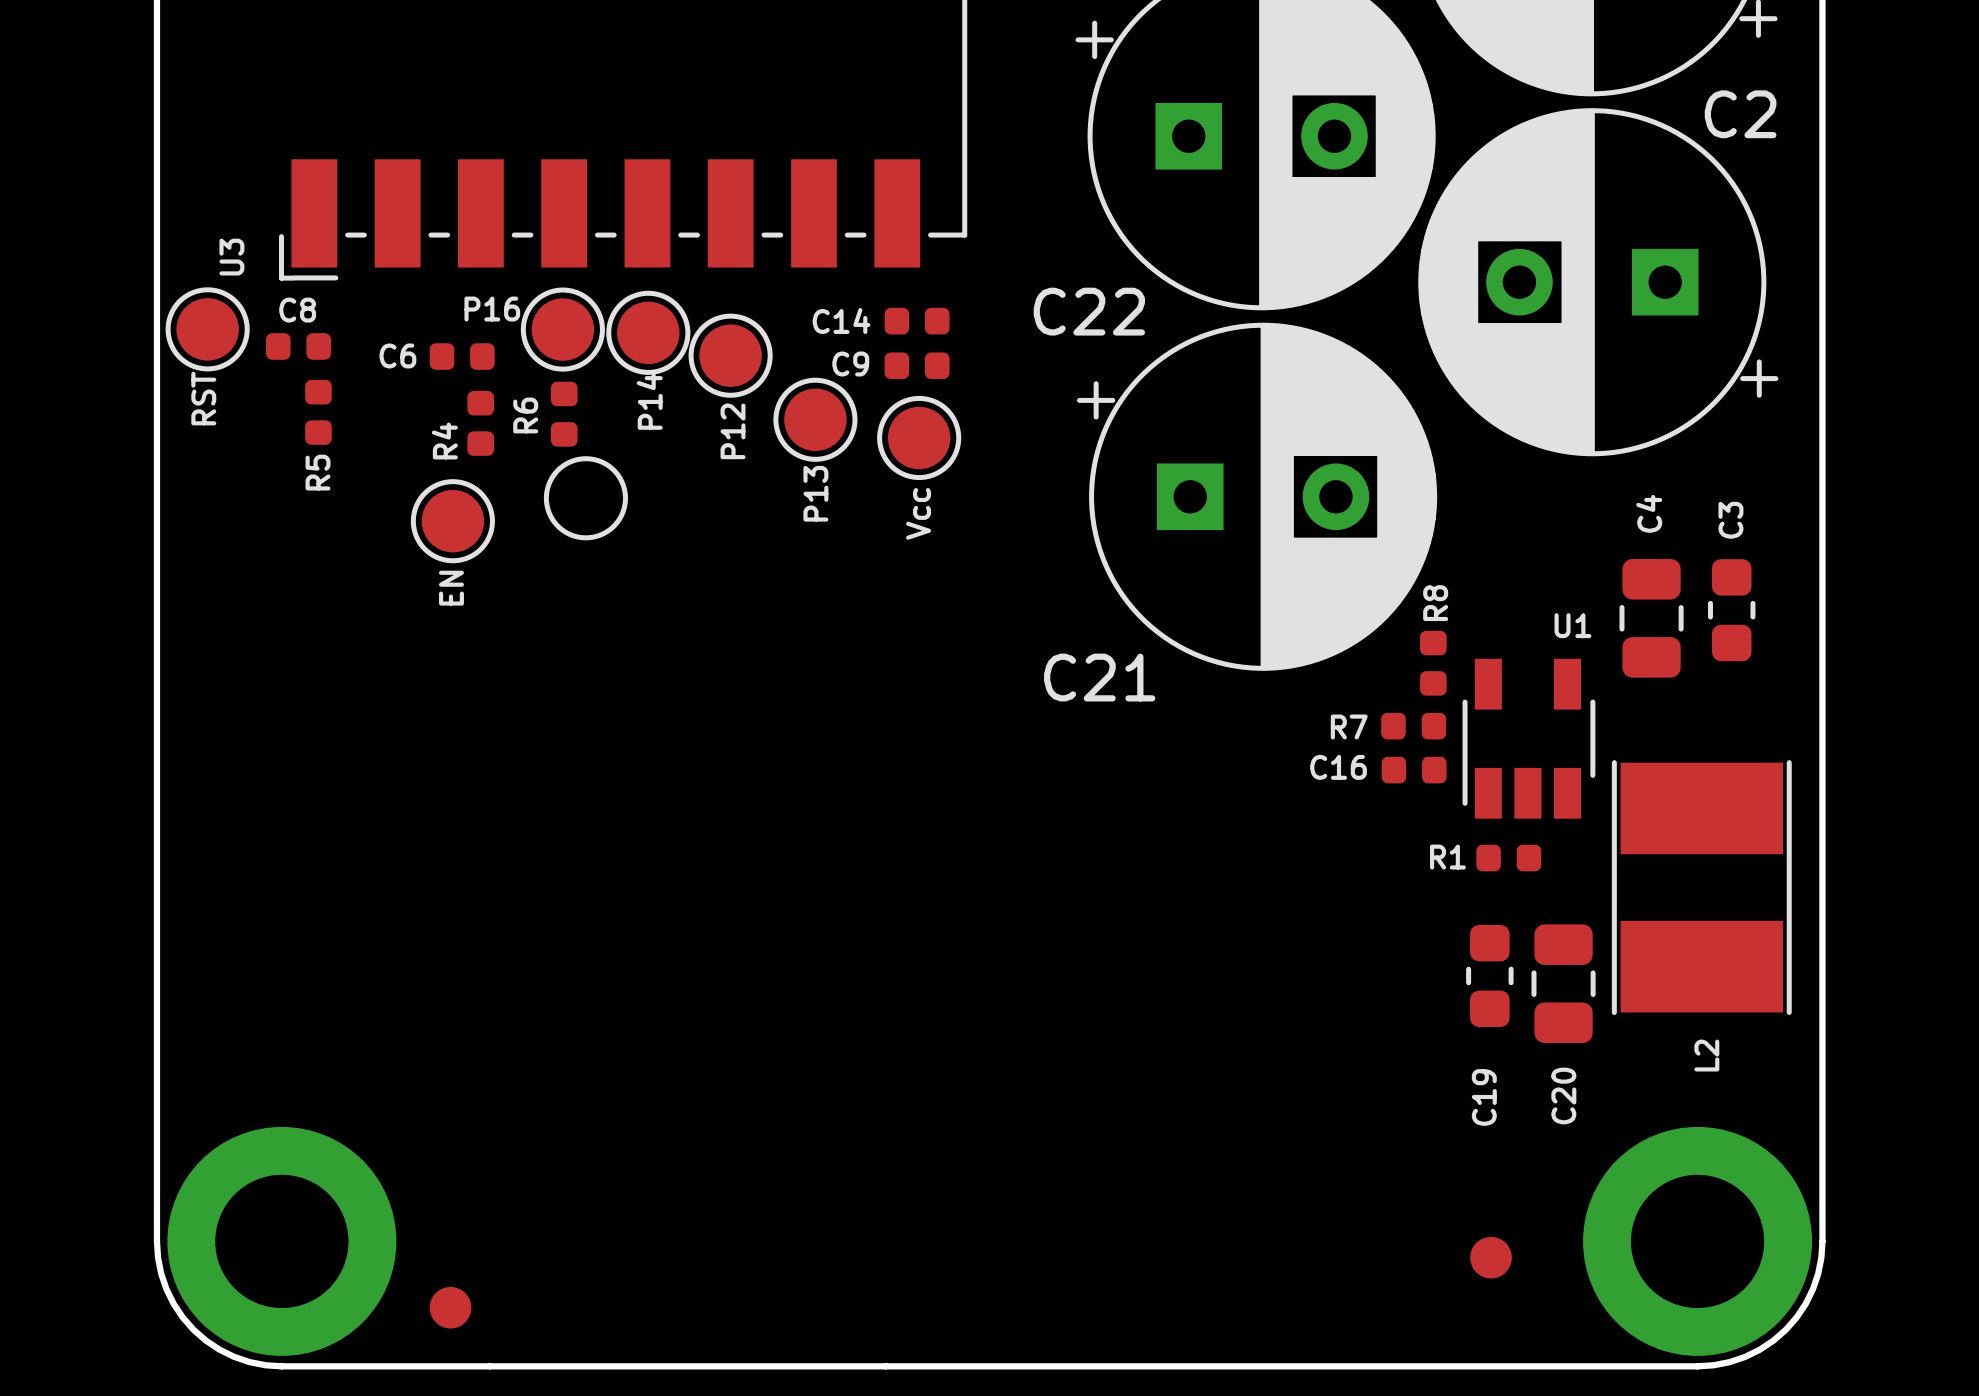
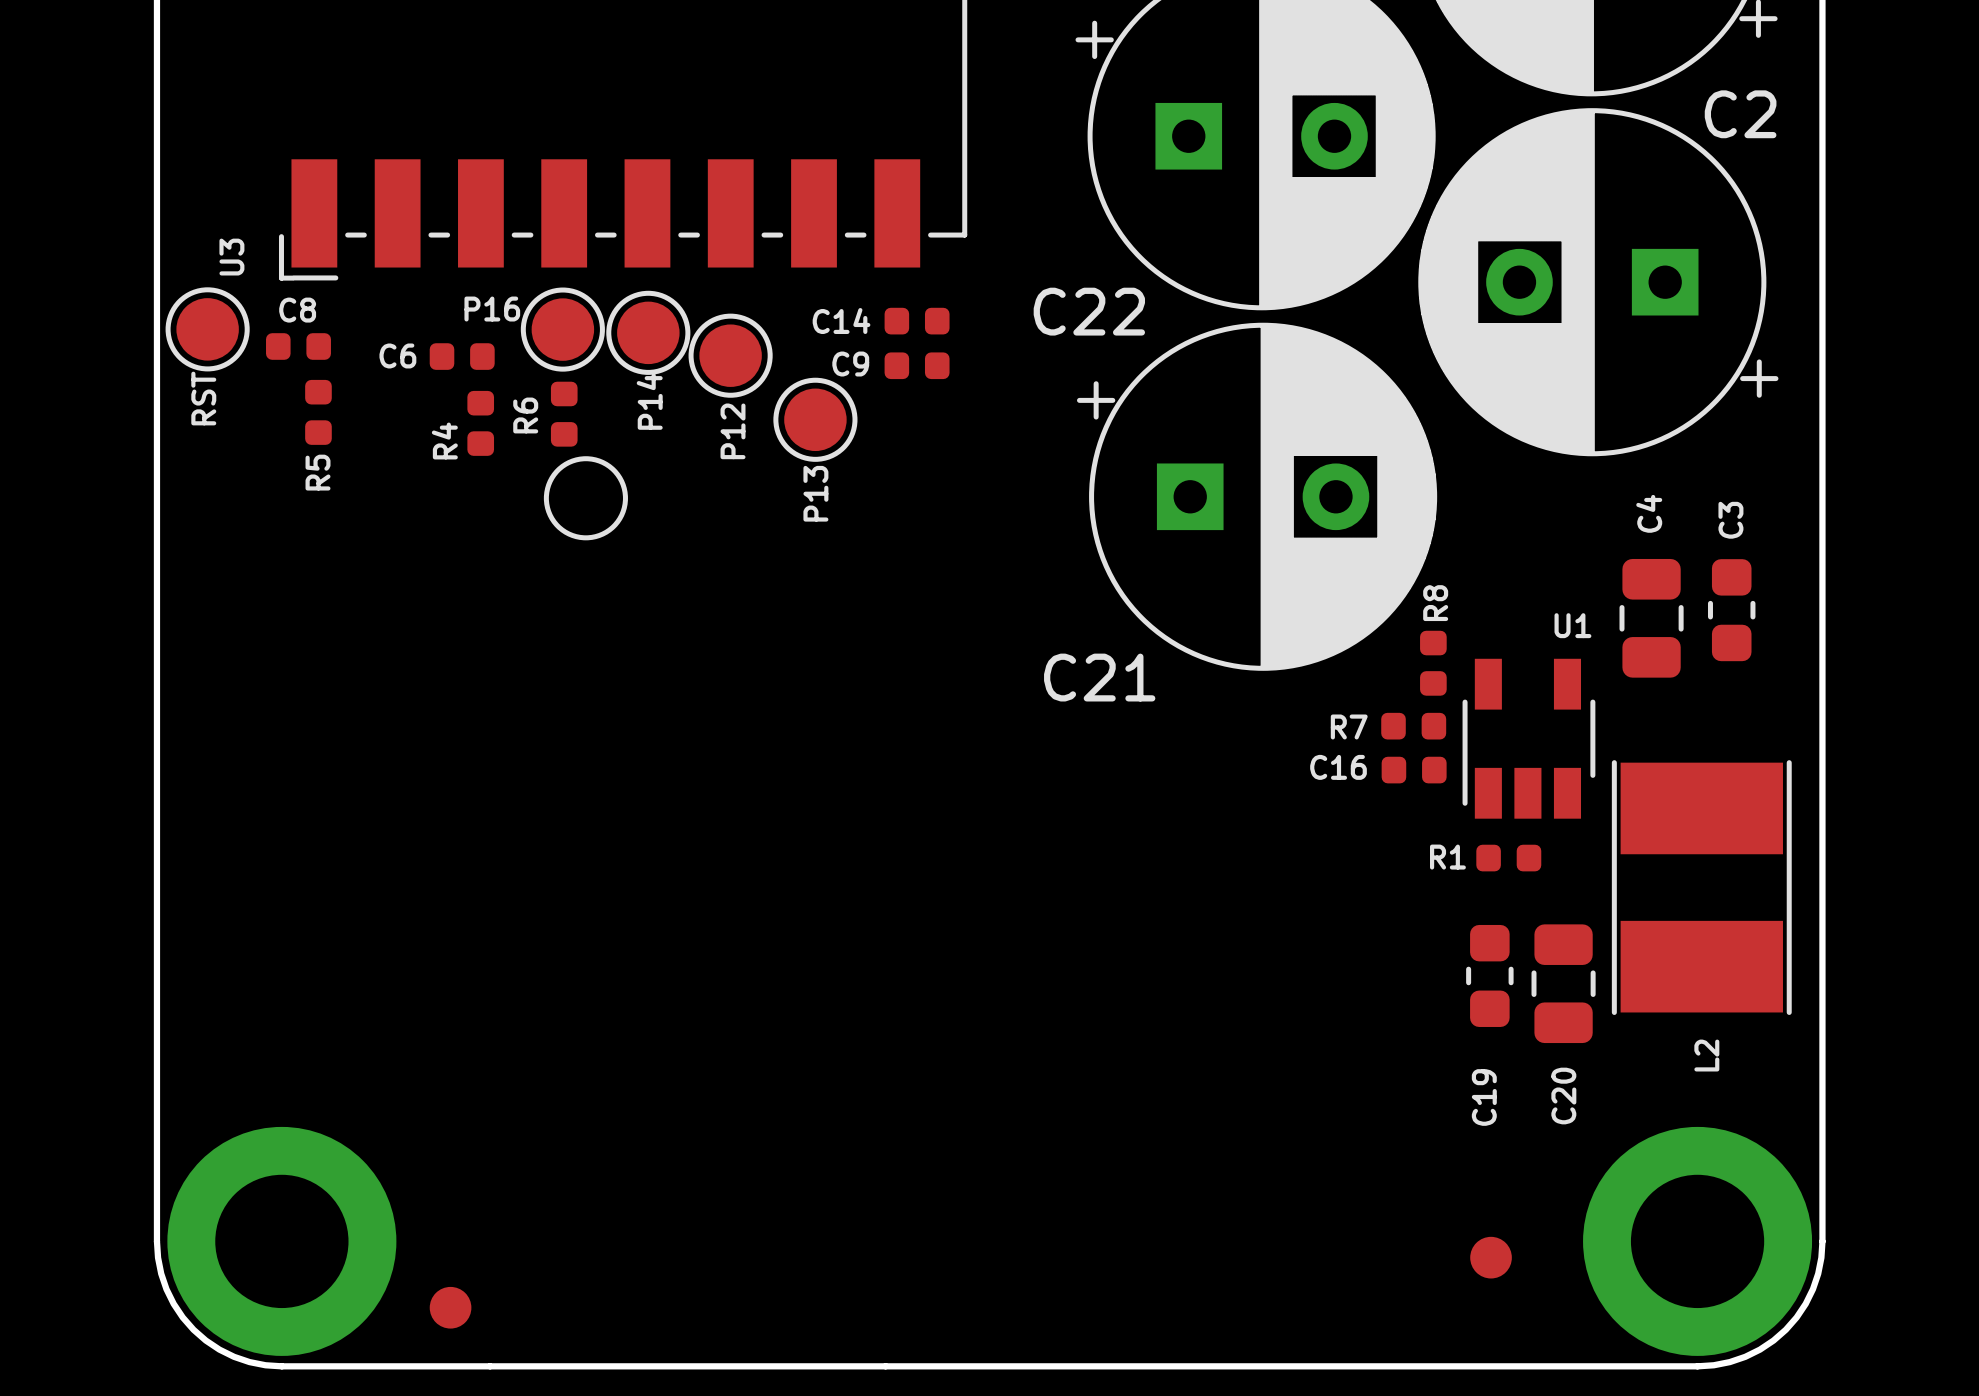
part: Vcc (919, 437) -> none
part: EN (452, 521) -> none

